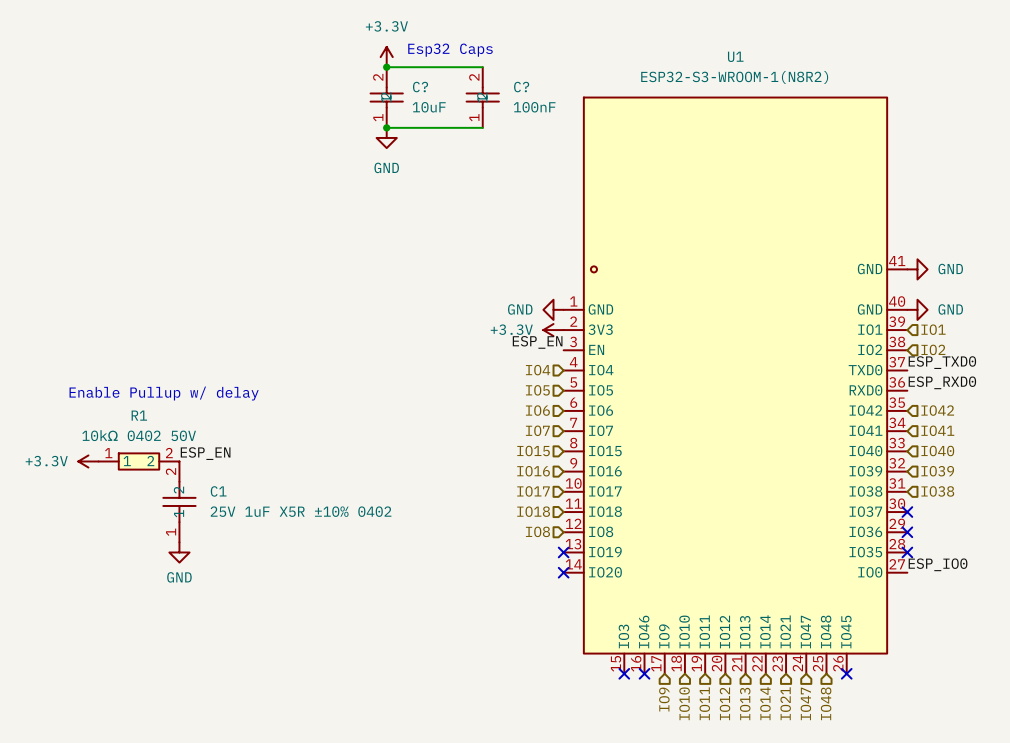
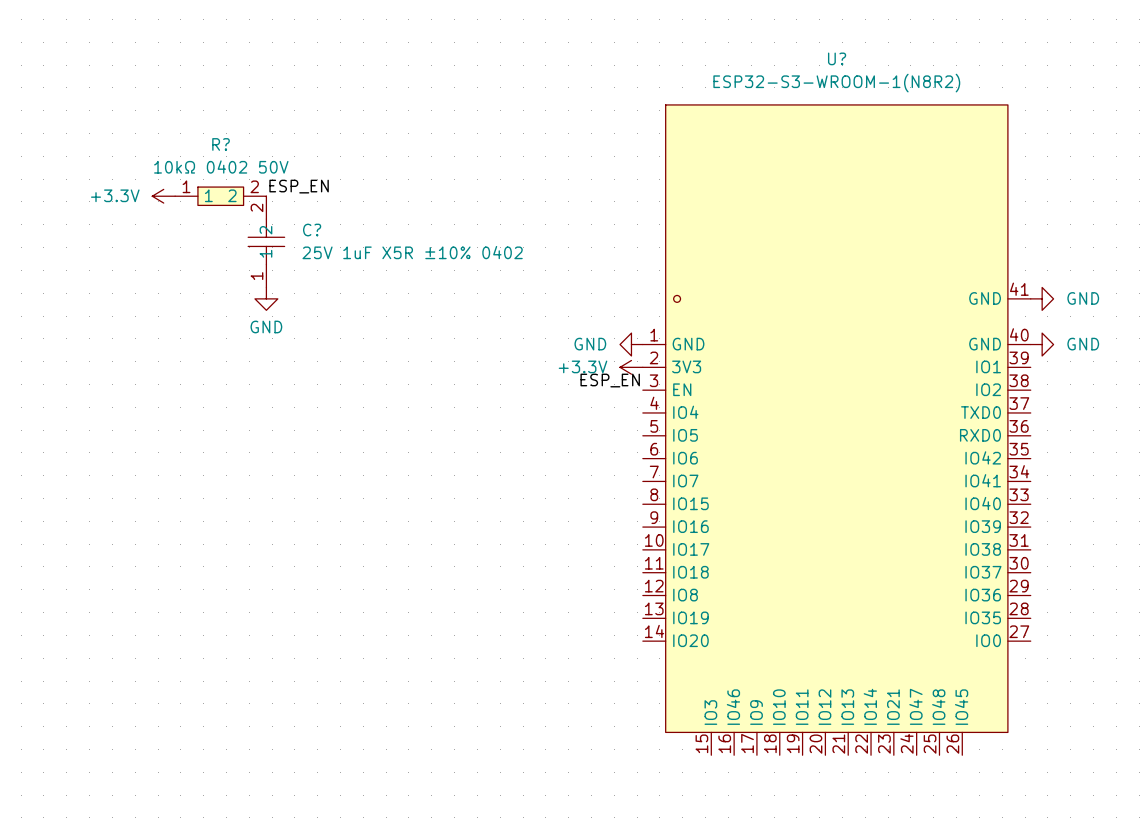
text: Esp32 Caps (450, 50) -> none
U1 name: U1 (735, 56) -> U? (837, 58)
power symbol: +3.3V (386, 57) -> none
wire: (386, 67) (482, 67) -> none
junction: (386, 67) -> none
C?: 10uF (386, 97) -> none
C?: 100nF (482, 97) -> none
wire: (386, 127) (482, 127) -> none
junction: (386, 127) -> none
power symbol: GND (386, 137) -> none
label: none -> ESP_EN (299, 186)
power symbol: none -> +3.3V (163, 196)
R?: none -> 10kΩ 0402 50V (220, 196)
C?: none -> 25V 1uF X5R ±10% 0402 (266, 241)
power symbol: none -> GND (266, 298)
hierarchical label: IO1 (933, 329) -> none
hierarchical label: IO2 (933, 349) -> none
label: ESP_TXD0 (942, 362) -> none
hierarchical label: IO4 (538, 370) -> none
label: ESP_RXD0 (942, 382) -> none
hierarchical label: IO5 (537, 390) -> none
text: Enable Pullup w/ delay (164, 393) -> none
hierarchical label: IO6 (537, 410) -> none
hierarchical label: IO42 (937, 410) -> none
hierarchical label: IO7 (537, 430) -> none
hierarchical label: IO41 (937, 430) -> none
hierarchical label: IO15 (533, 451) -> none
hierarchical label: IO40 (937, 451) -> none
label: ESP_EN (205, 453) -> none
power symbol: +3.3V (88, 461) -> none
R1: 10kΩ 0402 50V (139, 461) -> none
hierarchical label: IO16 (533, 471) -> none
hierarchical label: IO39 (937, 471) -> none
hierarchical label: IO17 (533, 491) -> none
hierarchical label: IO38 (937, 491) -> none
C1: 25V 1uF X5R ±10% 0402 (179, 501) -> none
hierarchical label: IO18 (533, 511) -> none
no-connect mark: (907, 512) -> none
hierarchical label: IO8 (537, 531) -> none
no-connect mark: (907, 532) -> none
power symbol: GND (179, 552) -> none
no-connect mark: (563, 552) -> none
no-connect mark: (907, 552) -> none
label: ESP_IO0 (938, 564) -> none
no-connect mark: (563, 572) -> none
no-connect mark: (624, 673) -> none
no-connect mark: (644, 673) -> none
no-connect mark: (846, 673) -> none
hierarchical label: IO9 (664, 699) -> none
hierarchical label: IO10 (684, 703) -> none
hierarchical label: IO11 (704, 703) -> none
hierarchical label: IO12 (725, 703) -> none
hierarchical label: IO14 (765, 703) -> none
hierarchical label: IO21 (785, 703) -> none
hierarchical label: IO47 (805, 703) -> none
hierarchical label: IO48 (826, 703) -> none
hierarchical label: IO13 (745, 704) -> none

